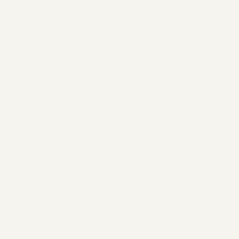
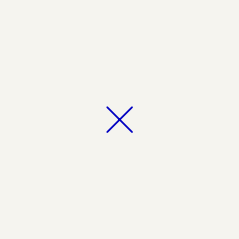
no-connect mark: none -> (119, 119)

